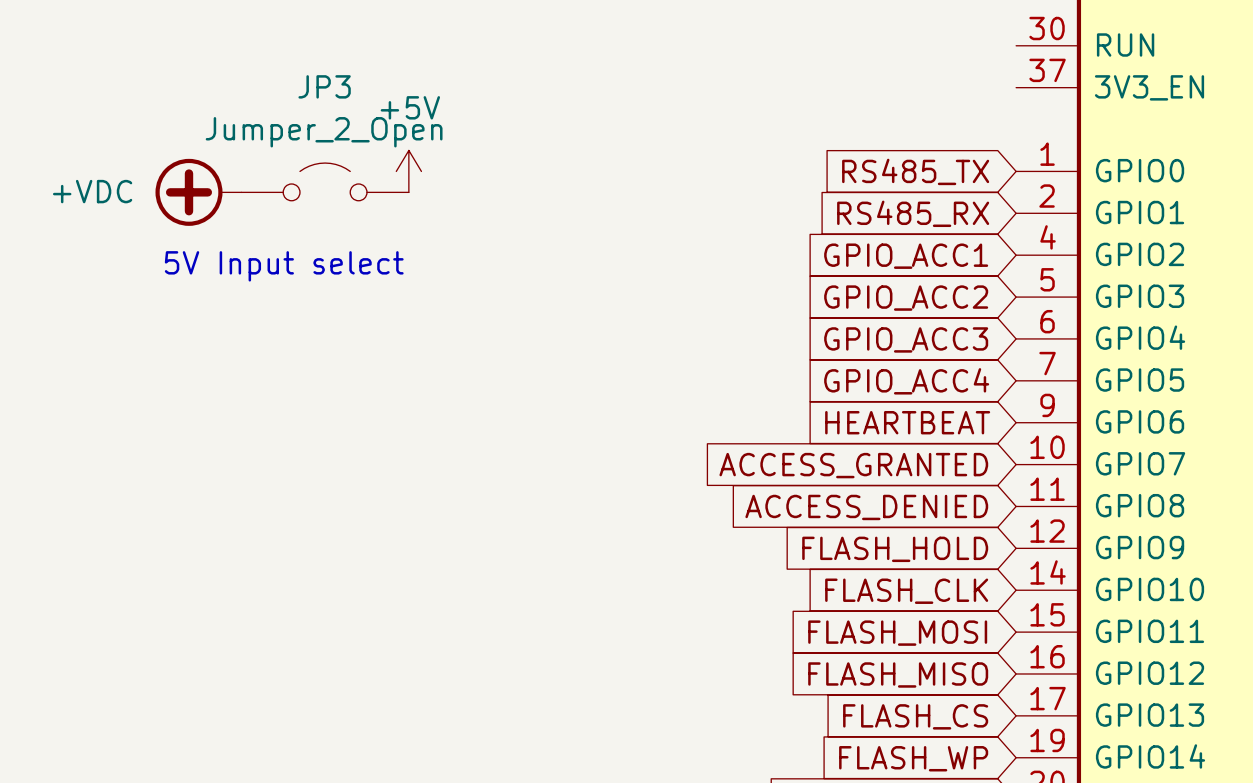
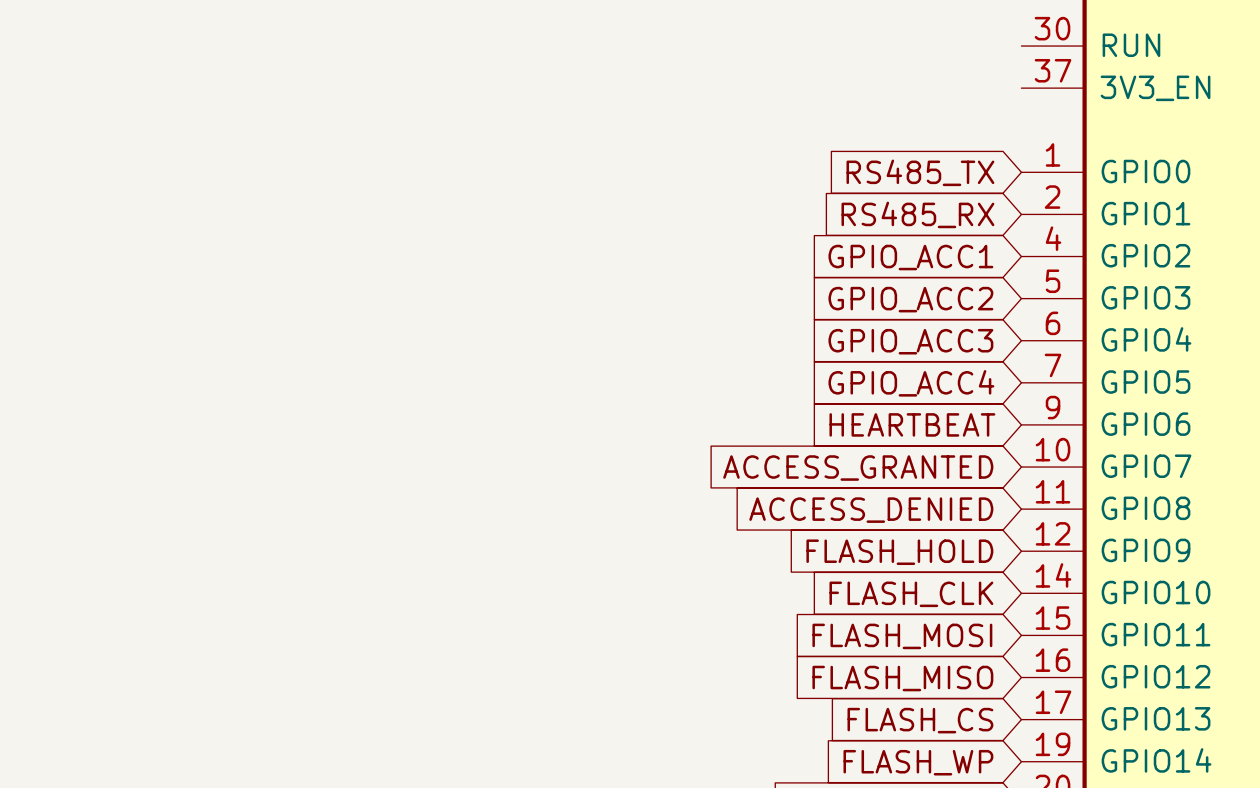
power symbol: +5V (408, 171) -> none
JP3: Jumper_2_Open (325, 181) -> none
power symbol: +VDC (198, 192) -> none
text: 5V Input select (284, 266) -> none

